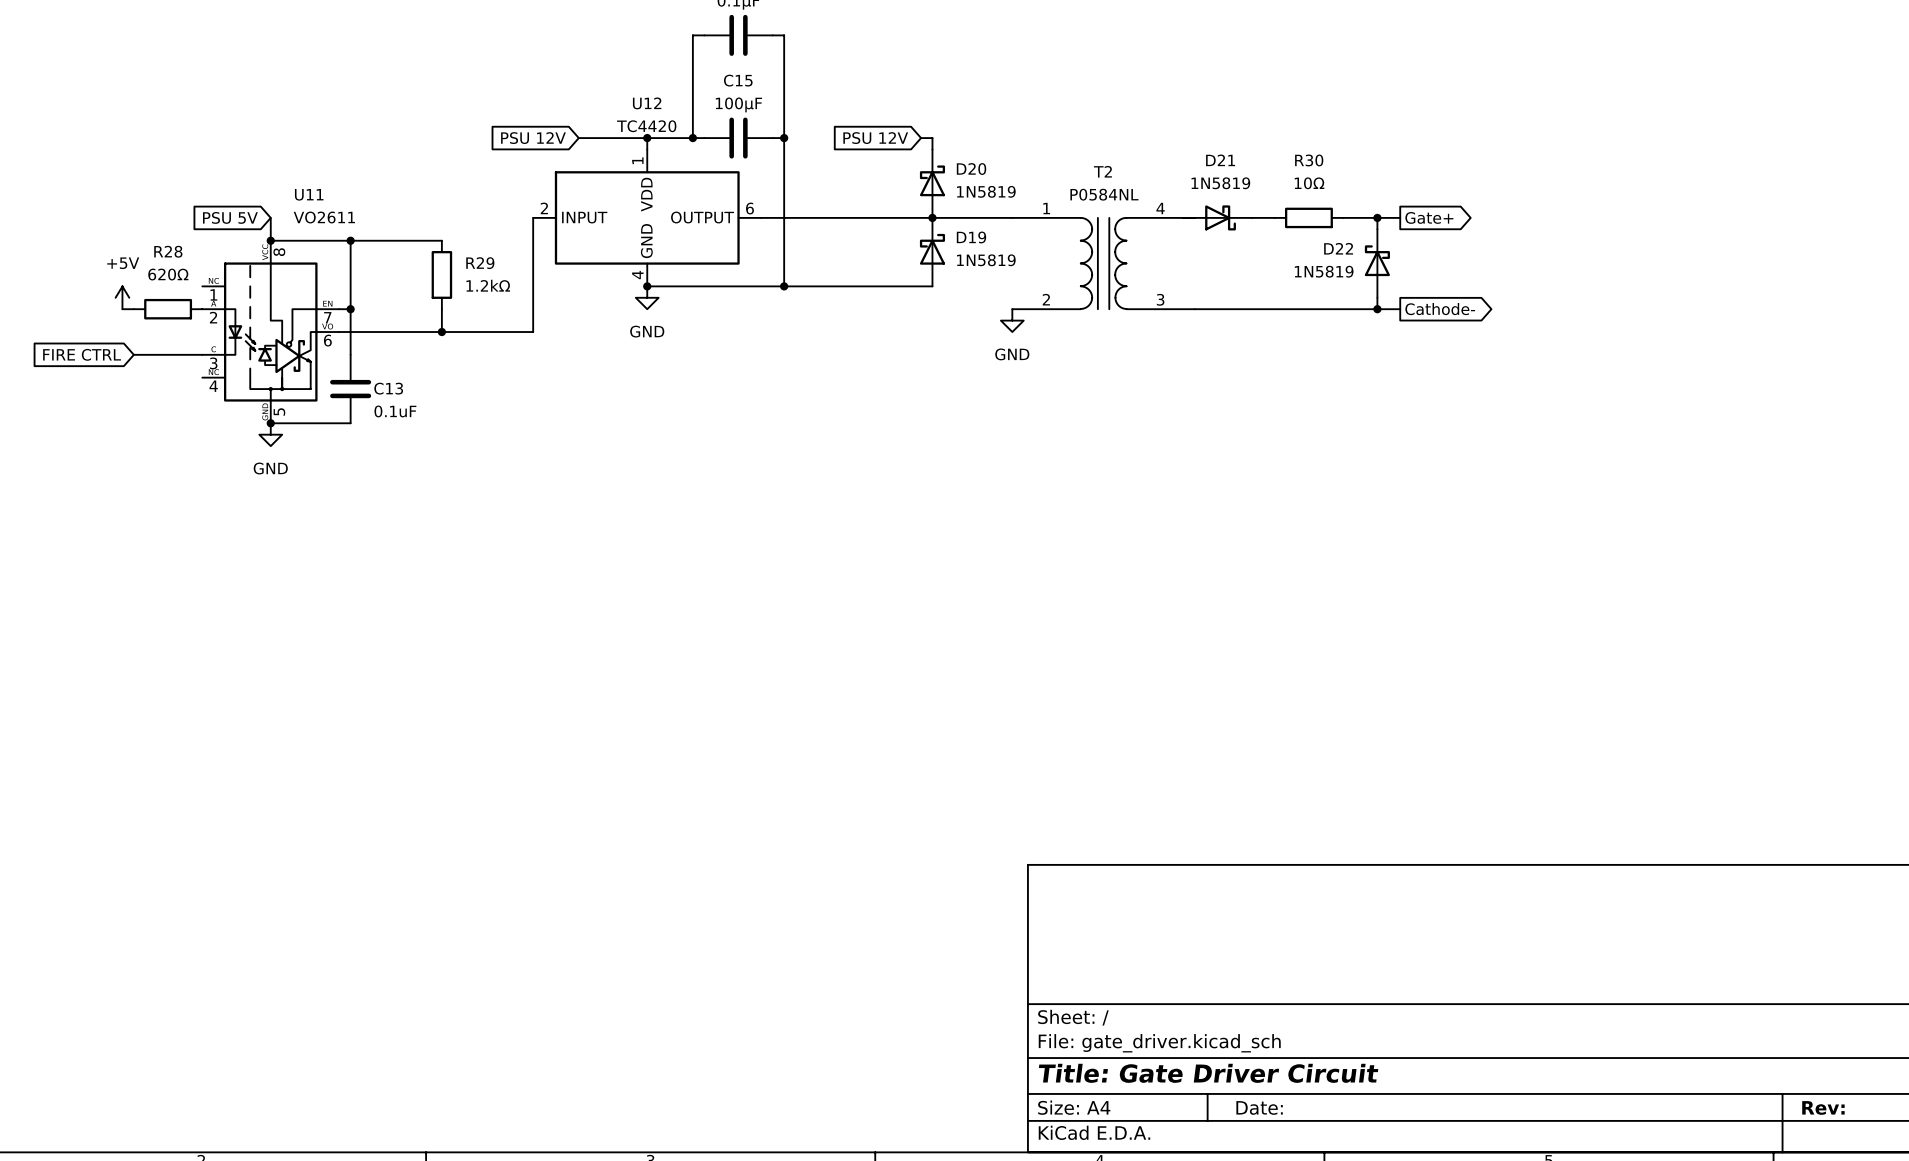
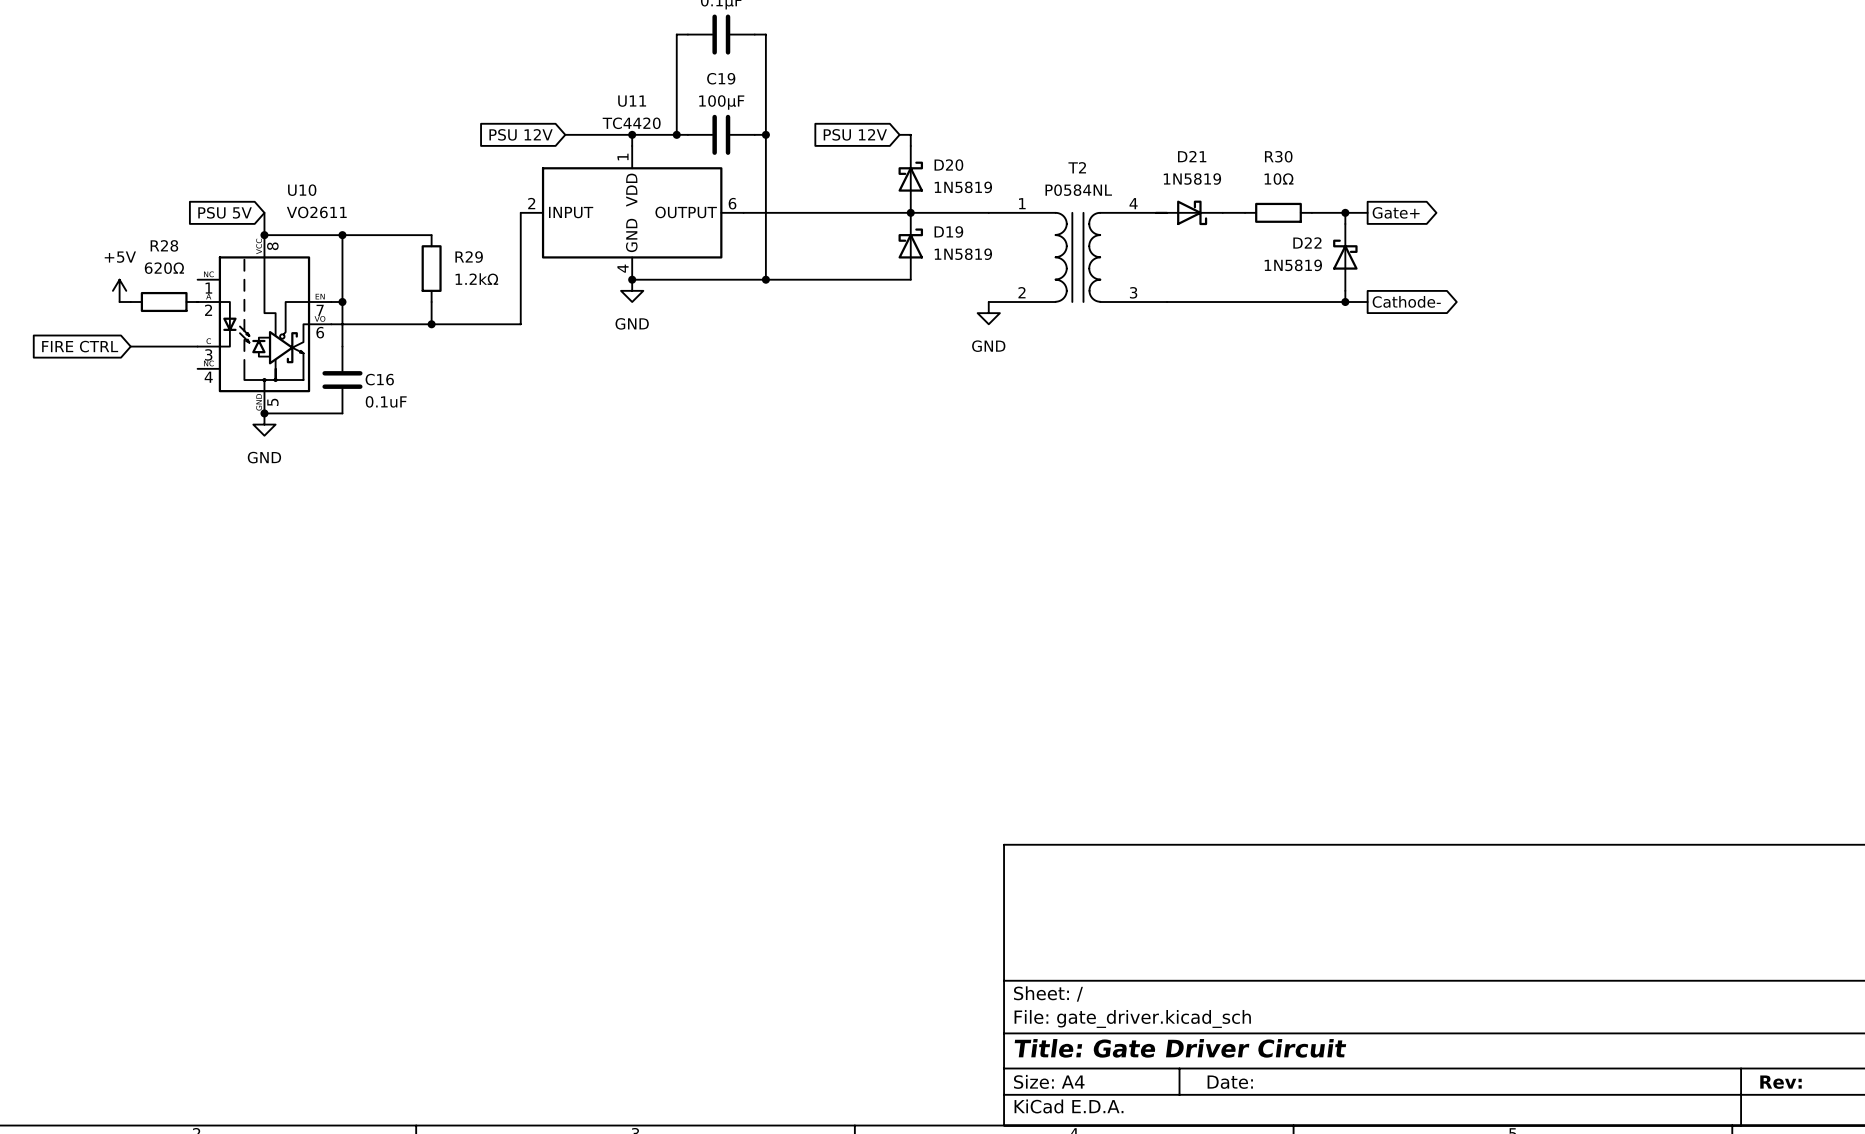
C15 name: C15 (738, 80) -> C19 (721, 78)
U12 name: U12 (647, 103) -> U11 (632, 101)
U11 name: U11 (309, 194) -> U10 (302, 190)
C13 name: C13 (388, 388) -> C16 (379, 379)

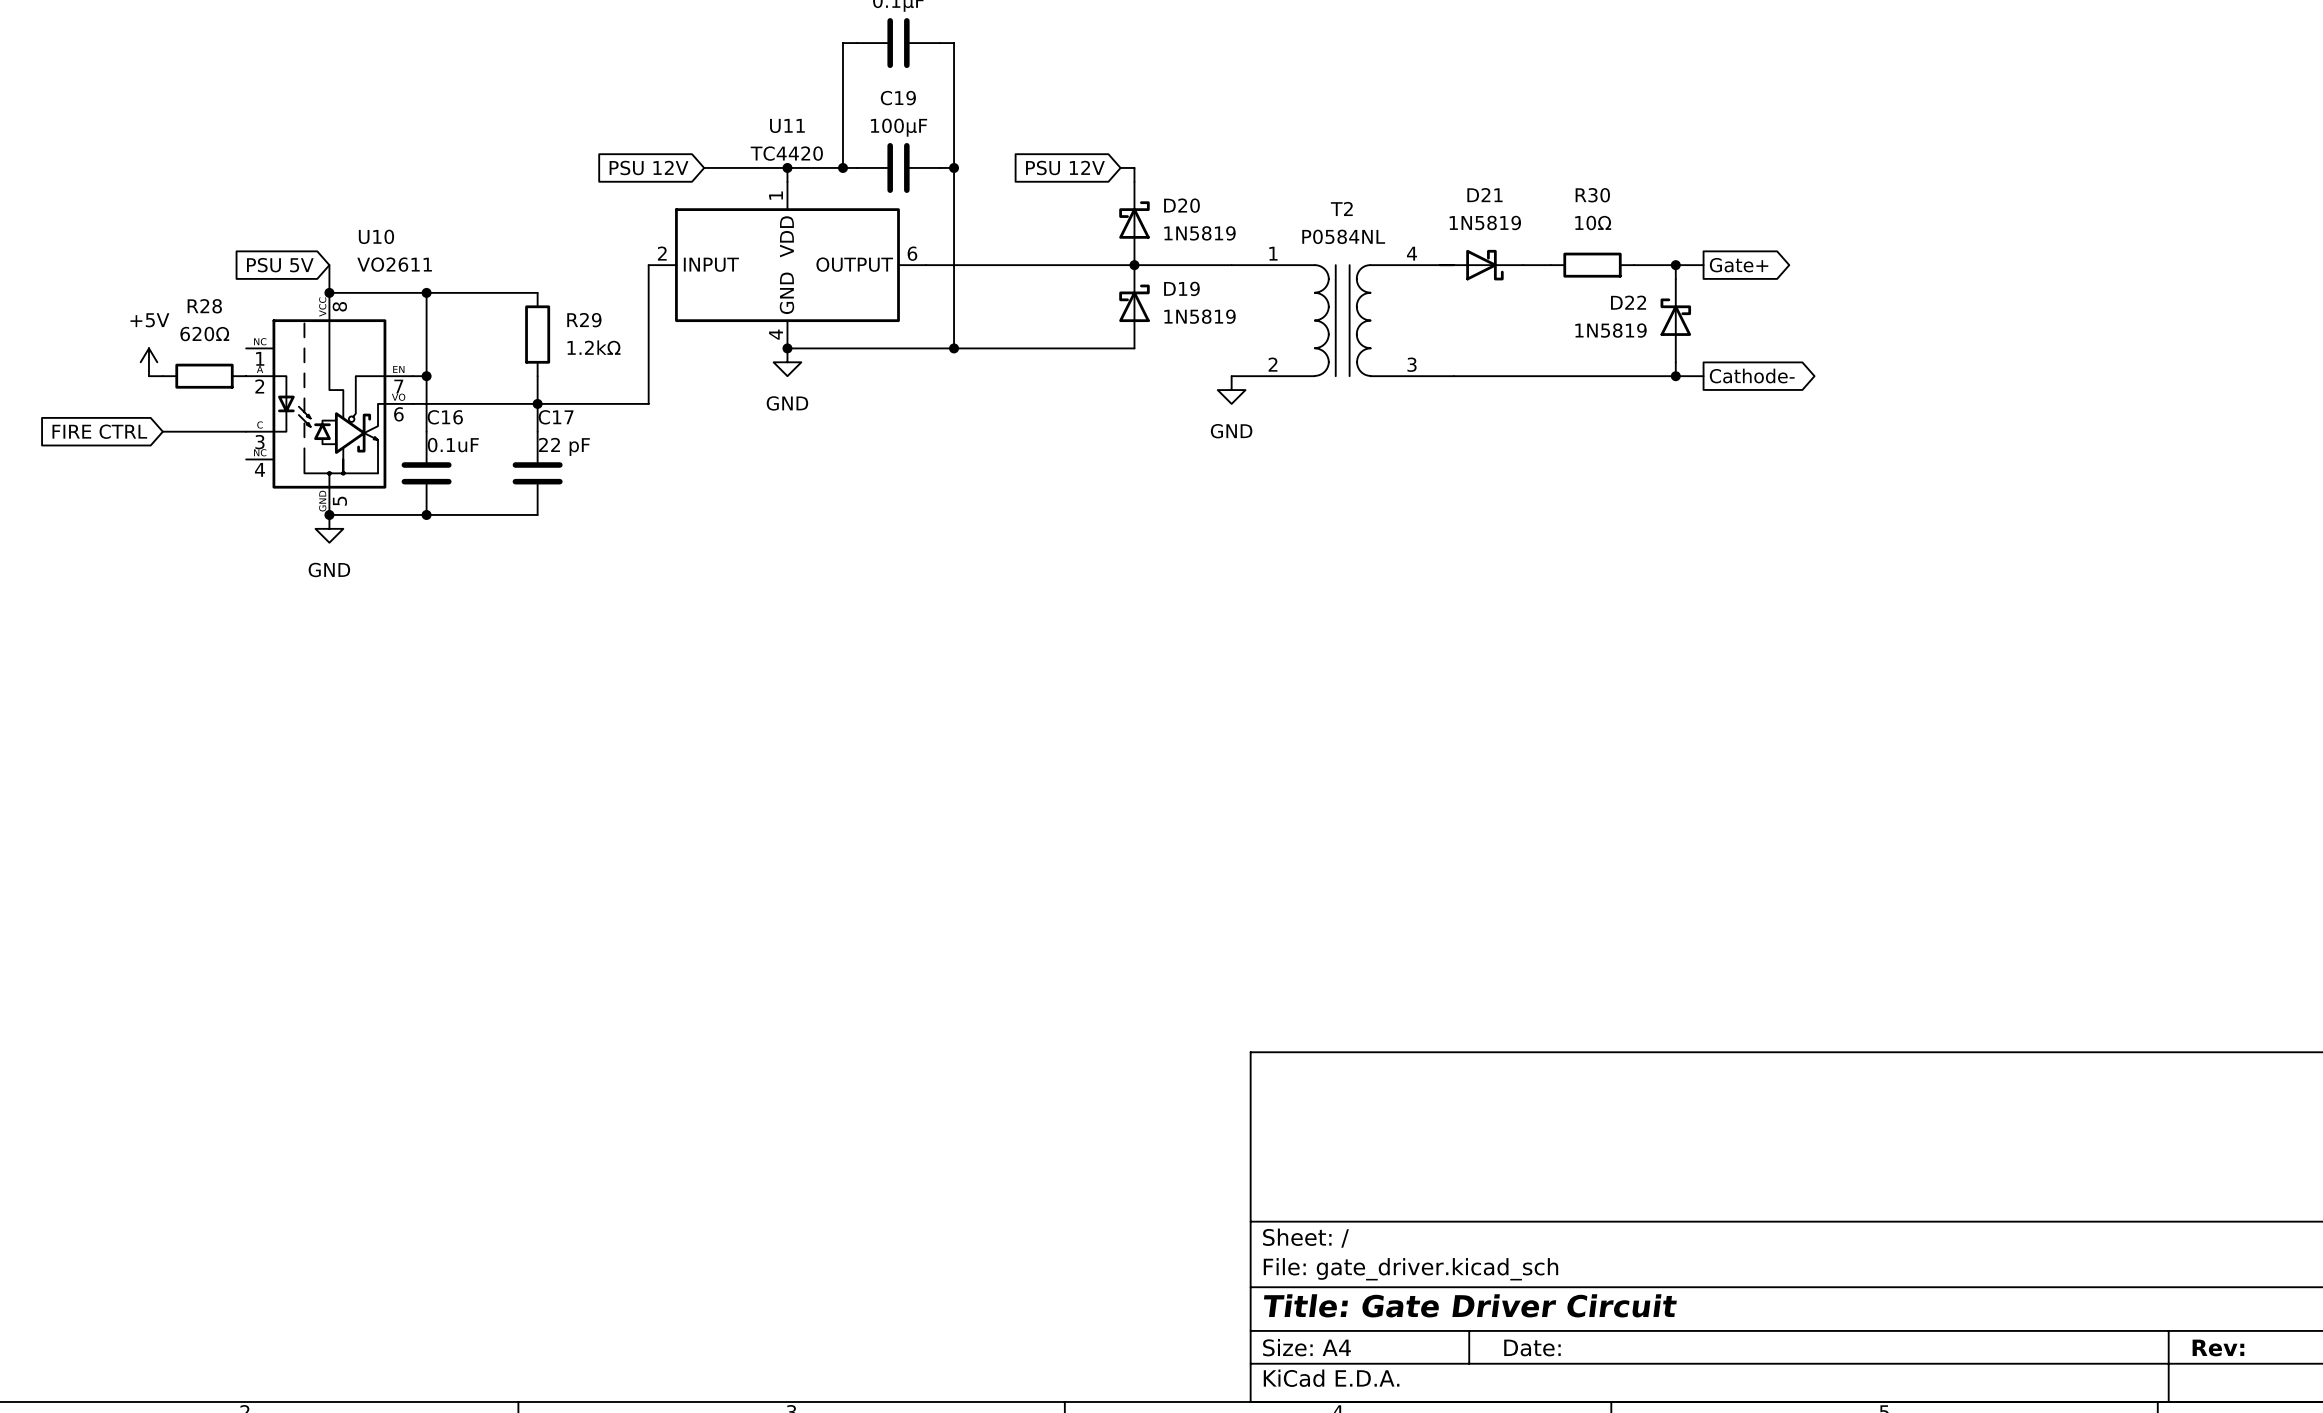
wire: none -> (537, 403) (537, 431)
C16 name position: C16 (379, 379) -> C16 (445, 417)
C17: none -> 22 pF (537, 473)
C16 value position: 0.1uF (386, 401) -> 0.1uF (453, 445)
wire: none -> (426, 514) (537, 514)
junction: none -> (426, 514)

